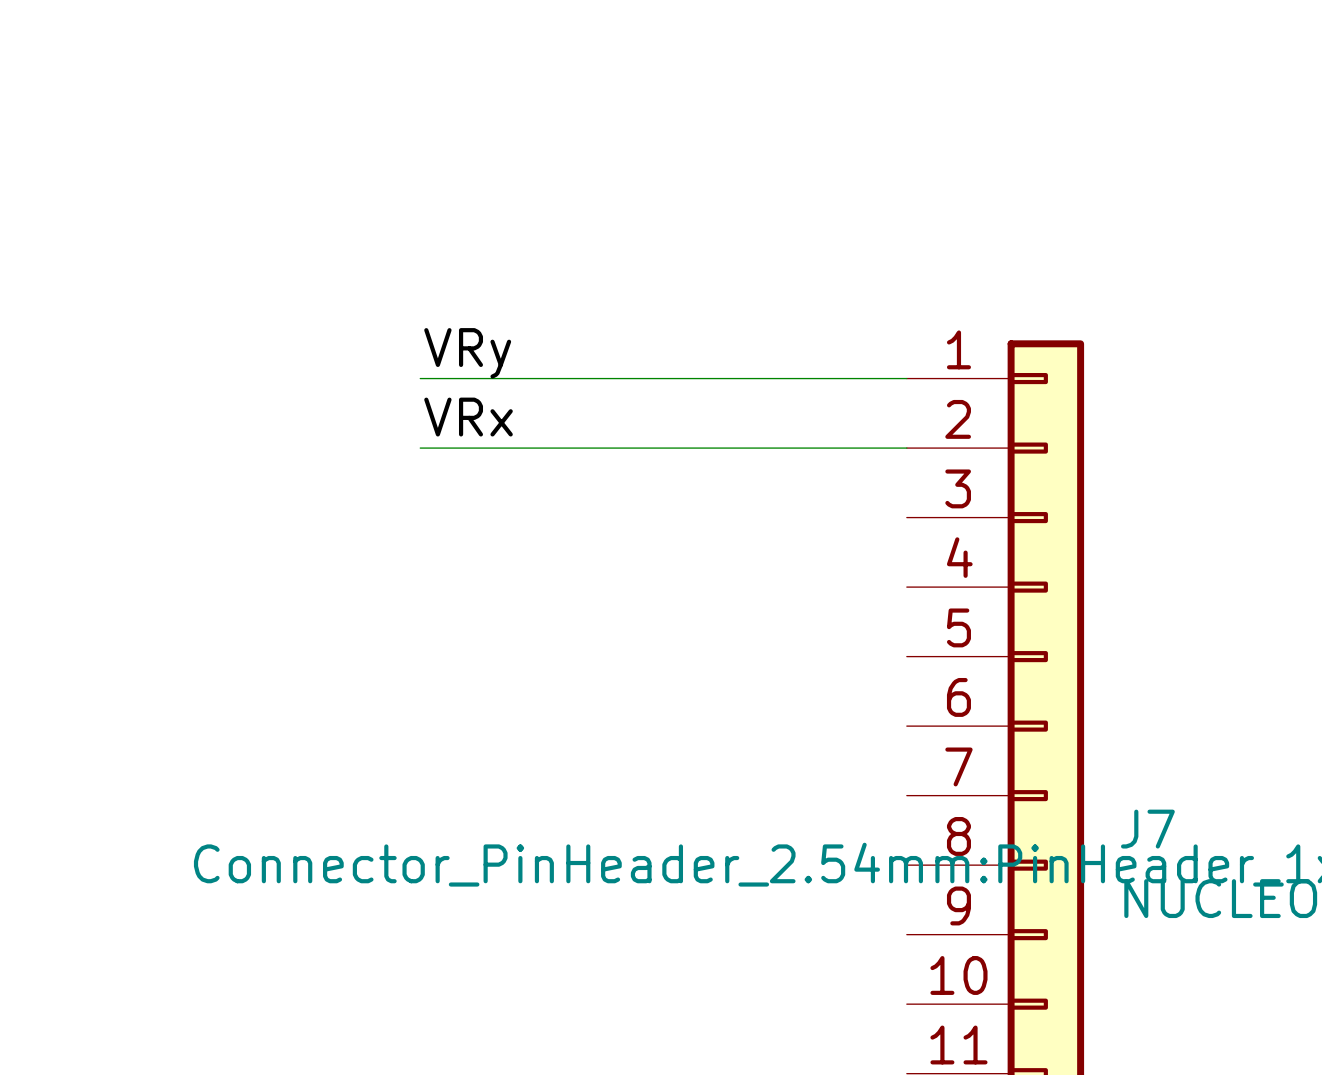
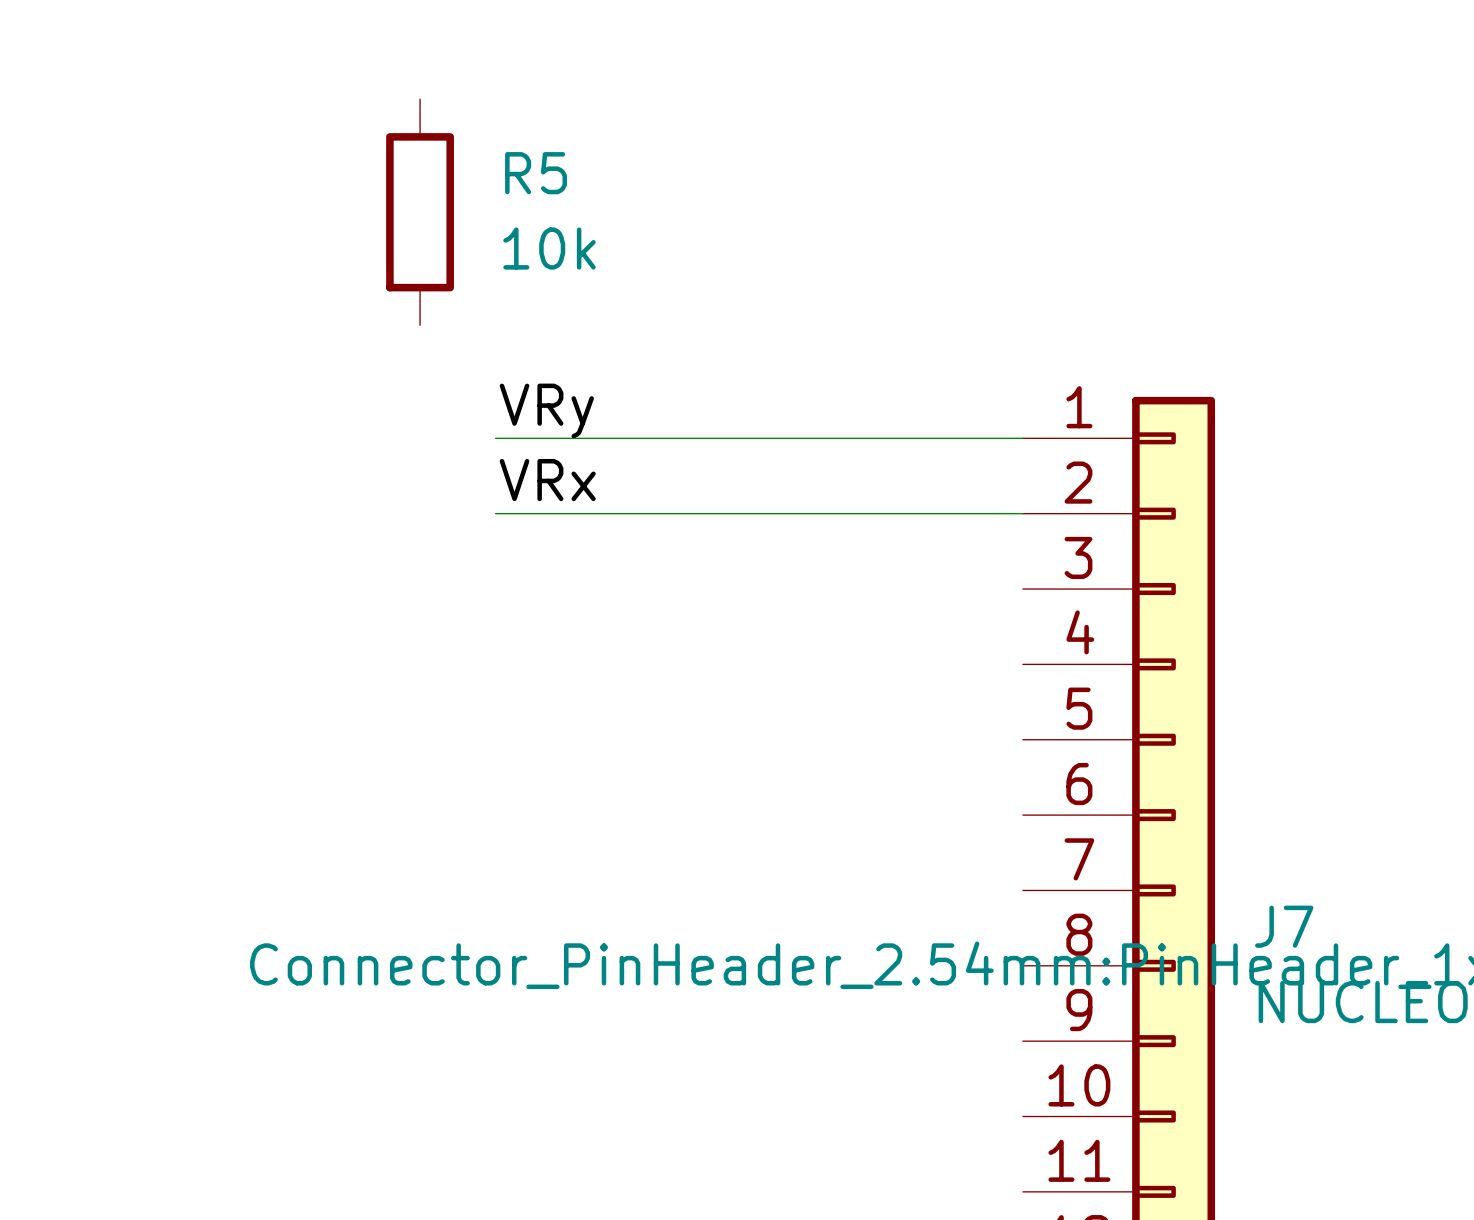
R5: none -> 10k (420, 212)

